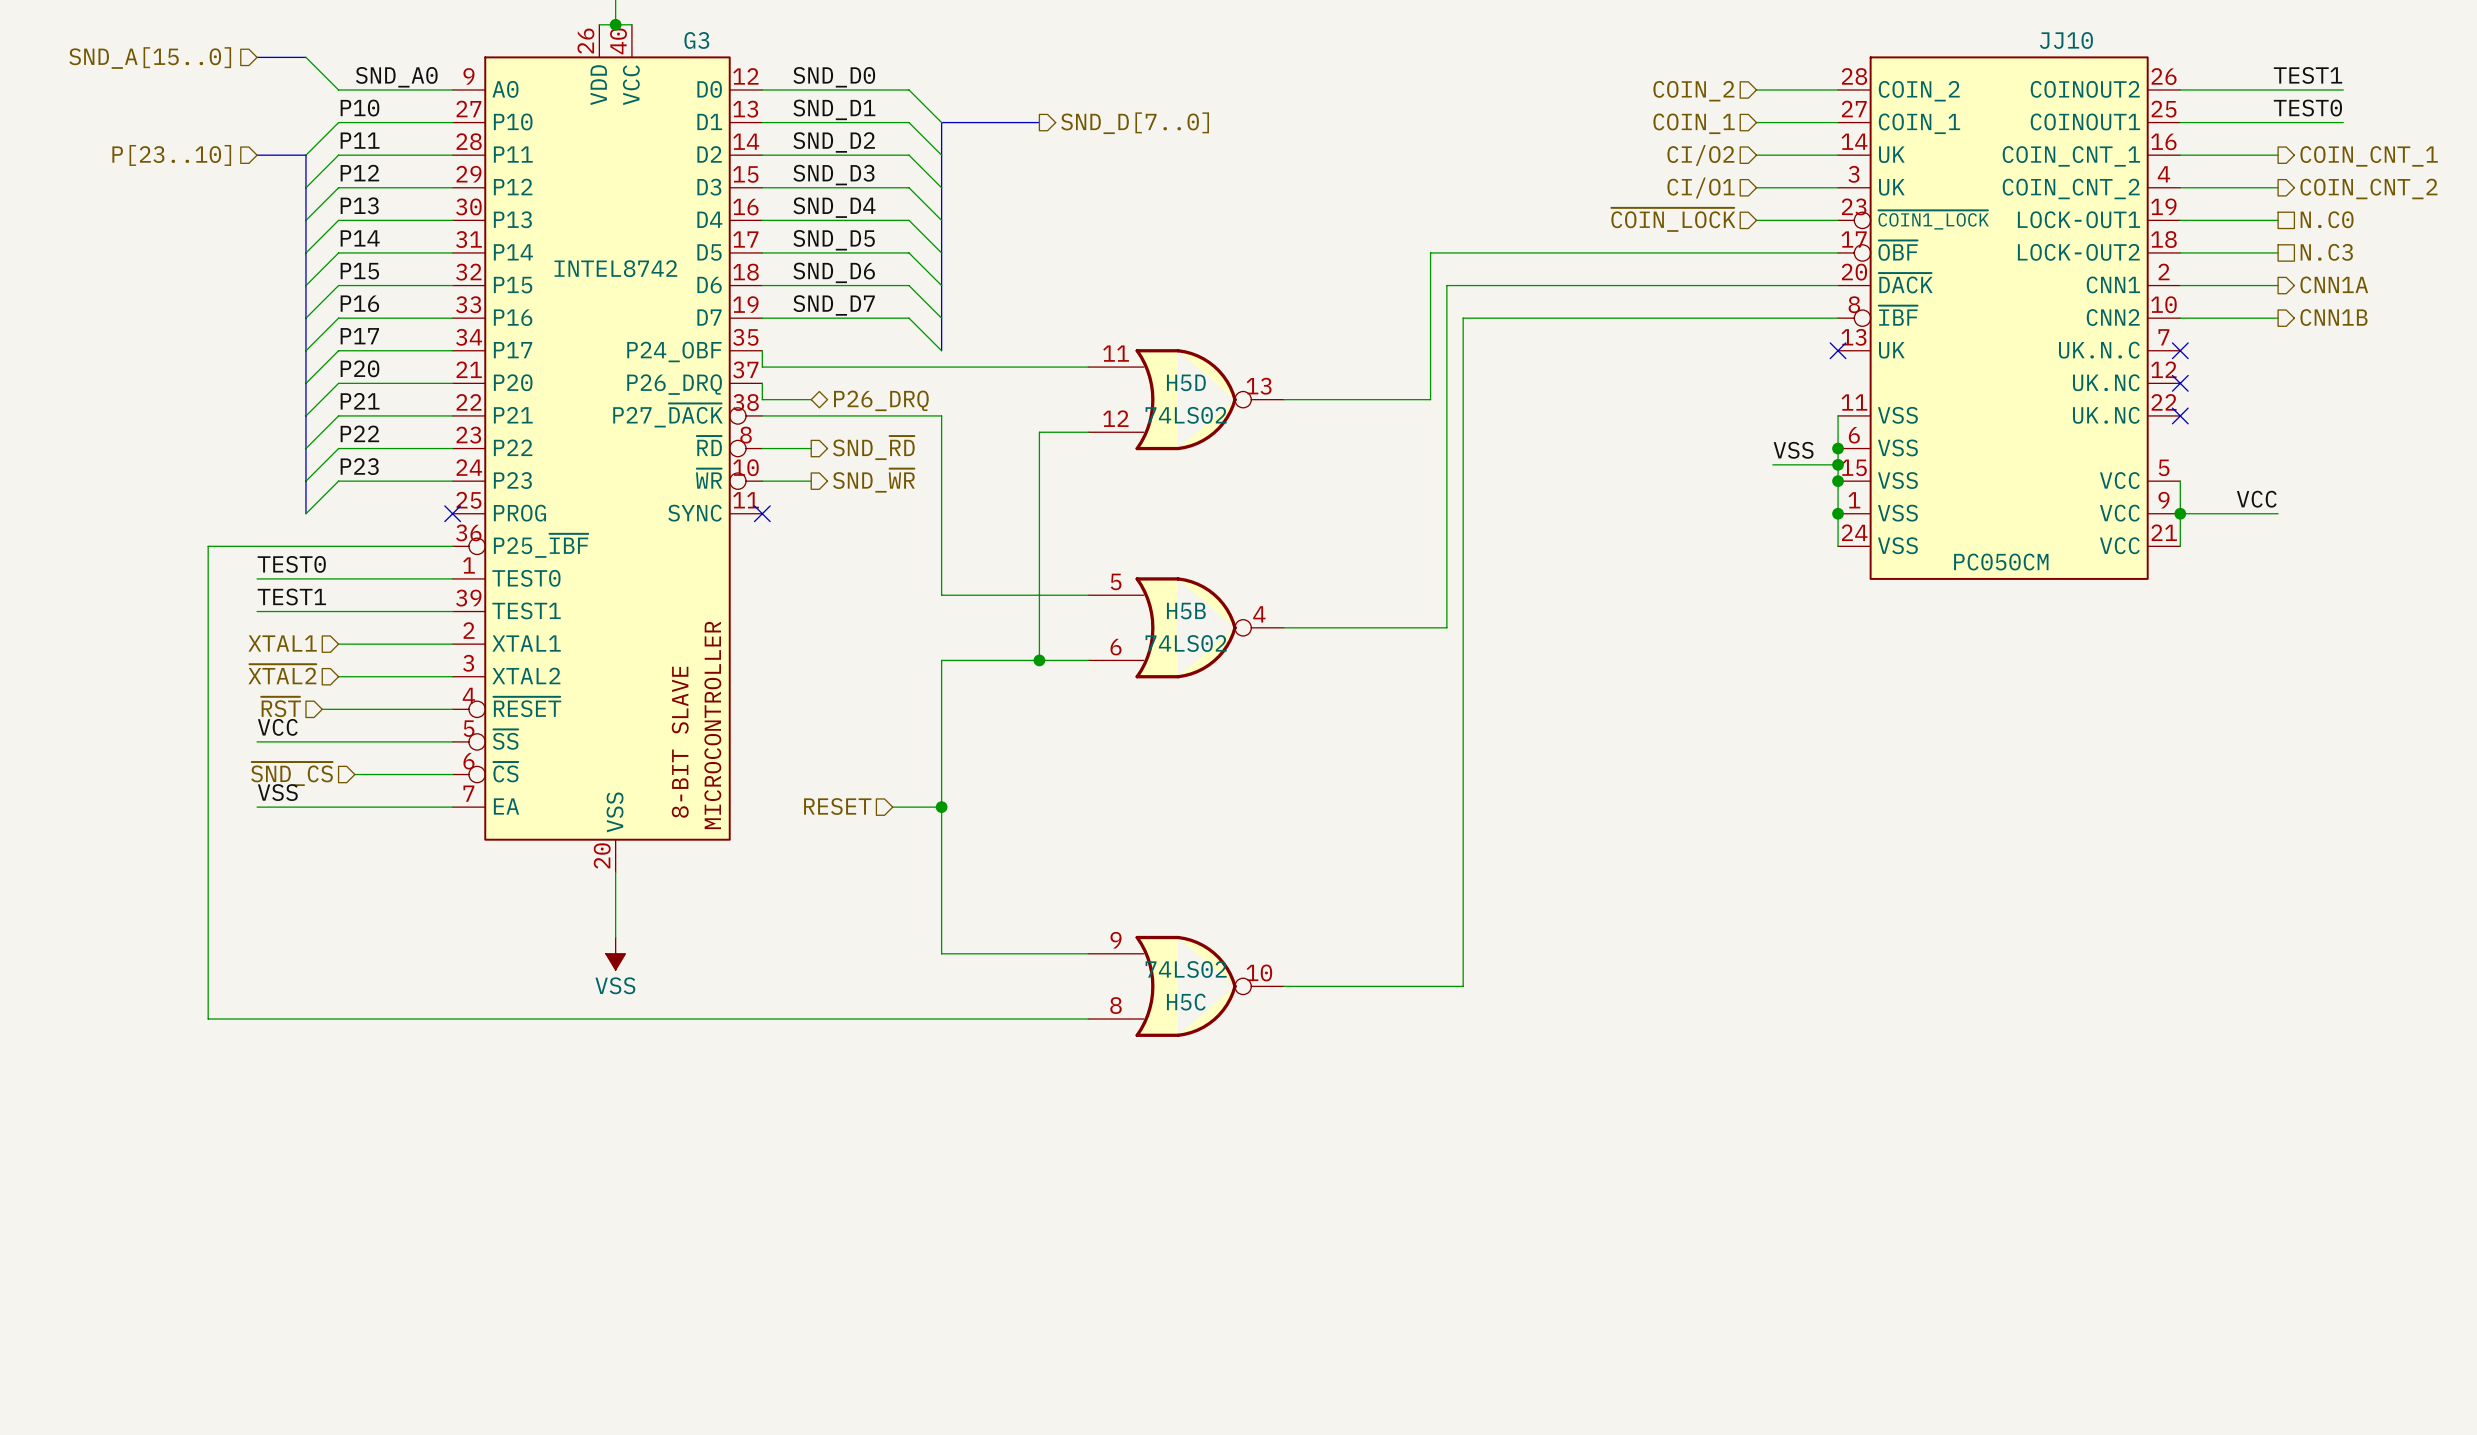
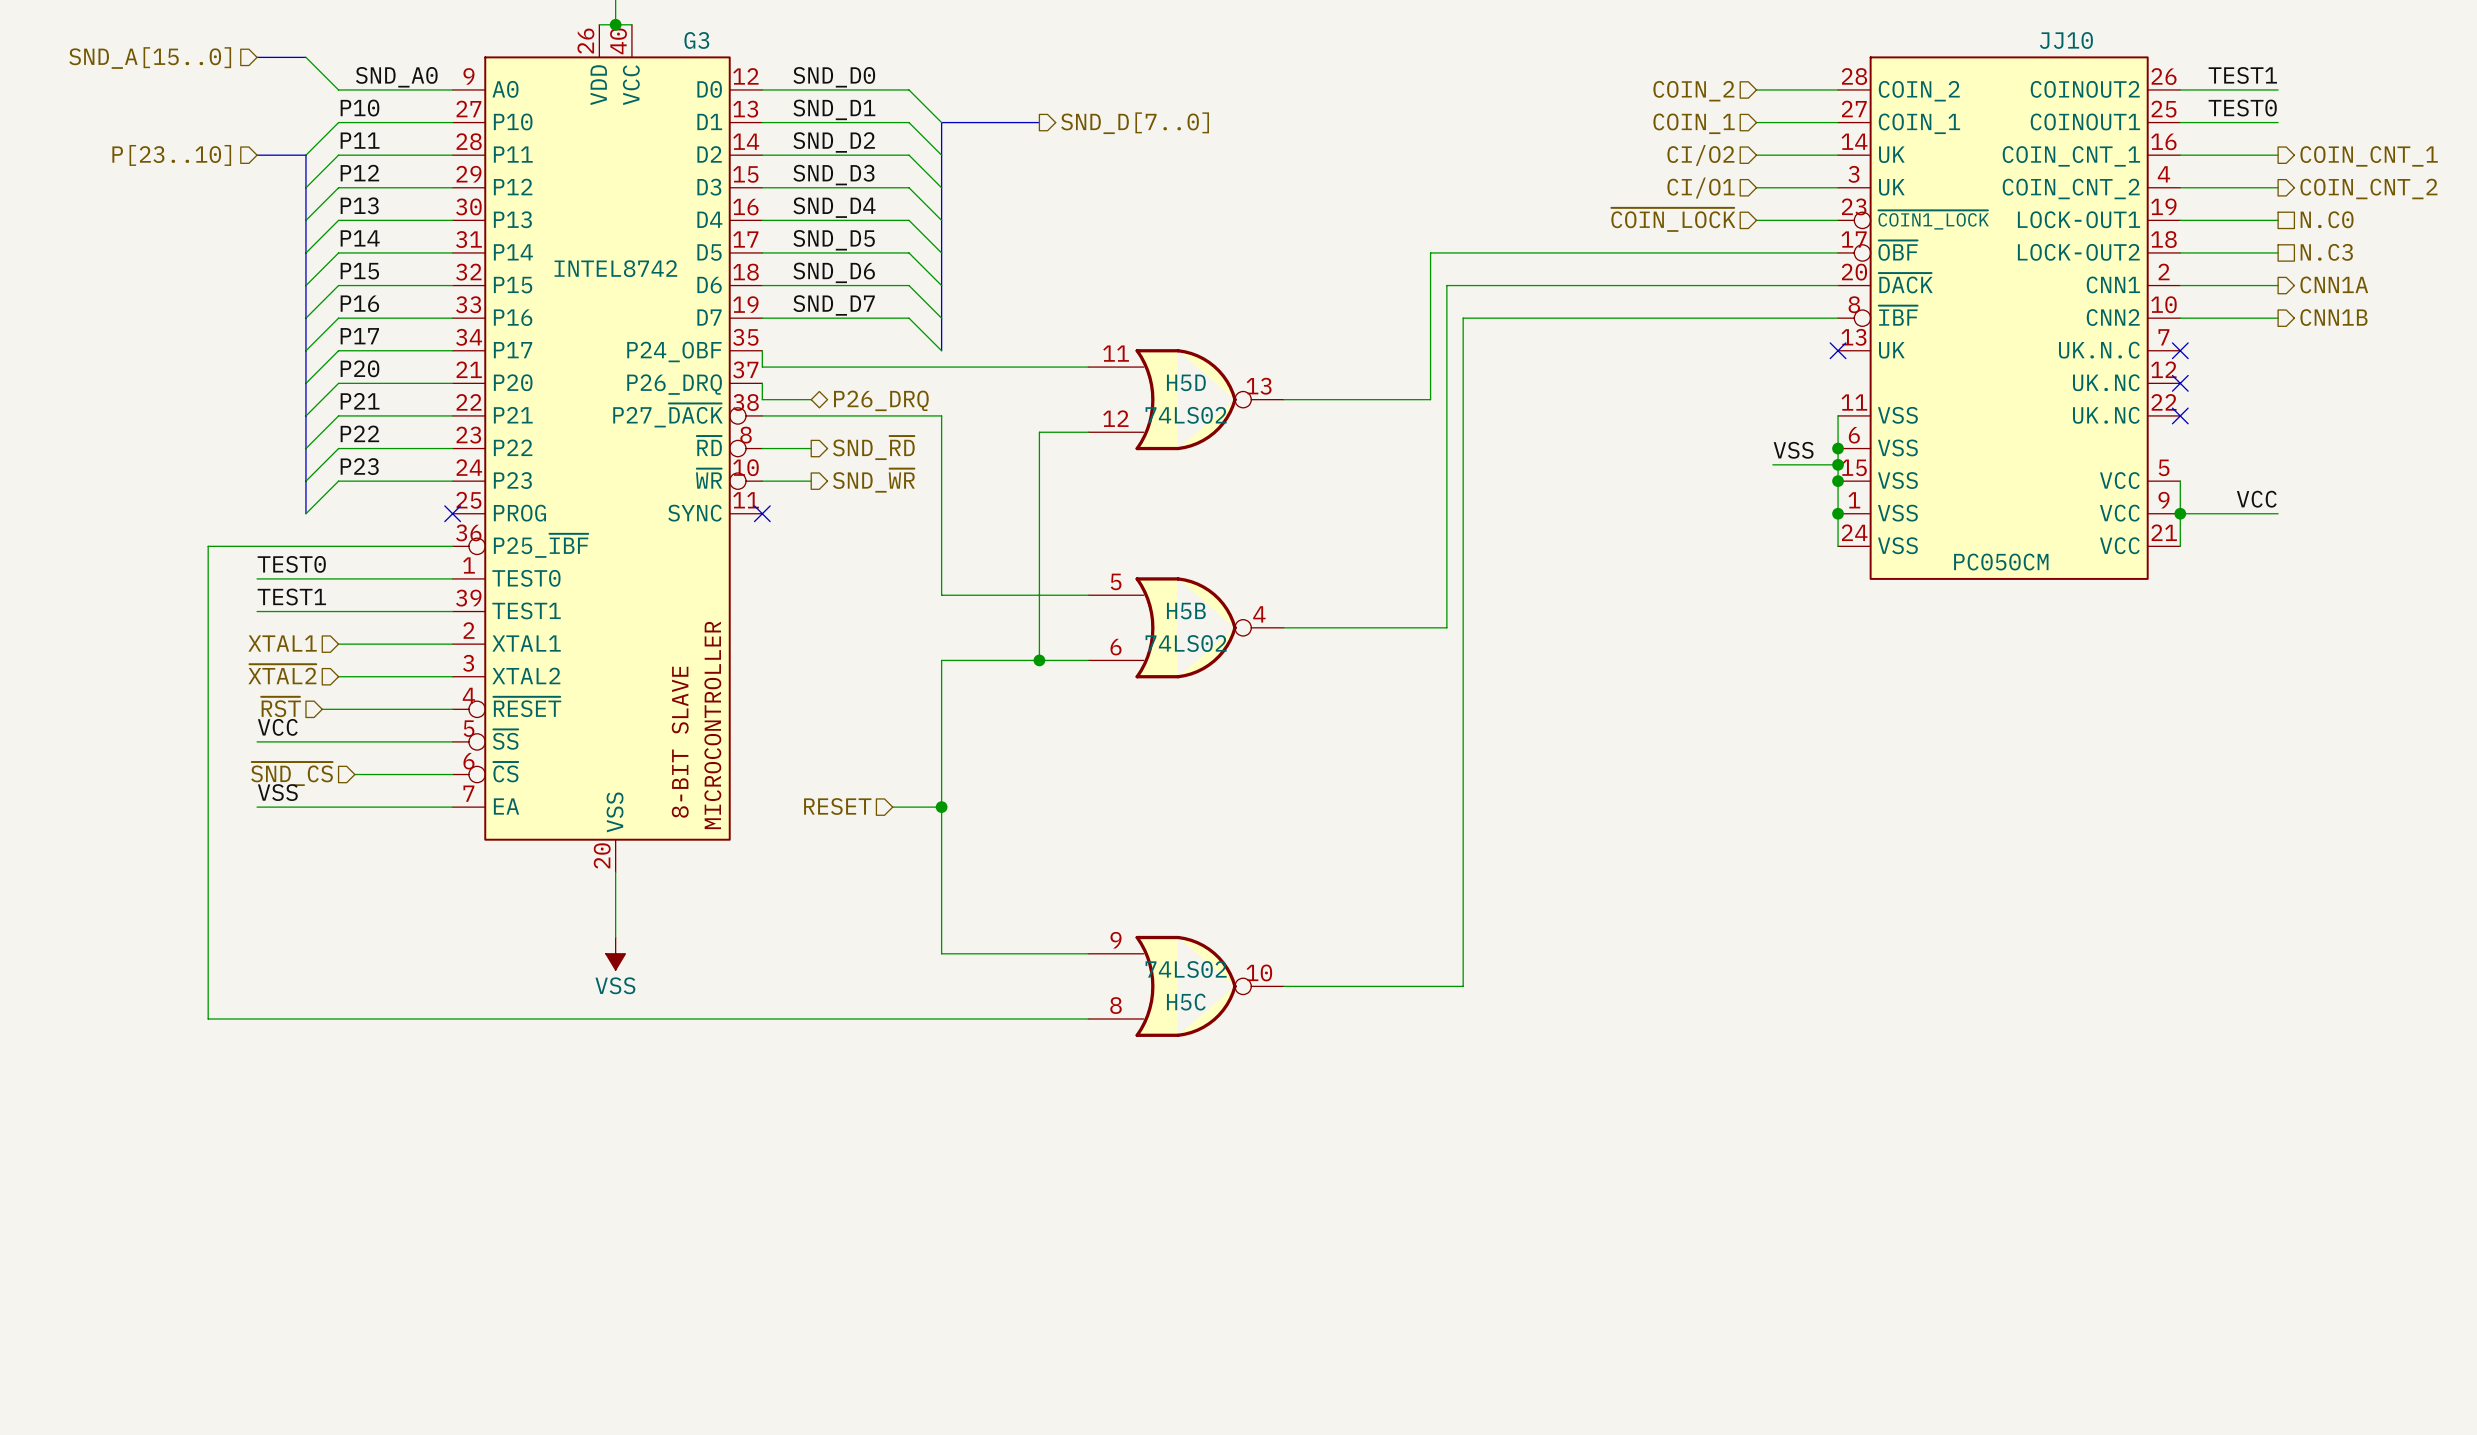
label position: TEST1 (2308, 75) -> TEST1 (2242, 75)
wire: (2278, 89) (2343, 89) -> none
label position: TEST0 (2307, 108) -> TEST0 (2242, 108)
wire: (2278, 122) (2343, 122) -> none

